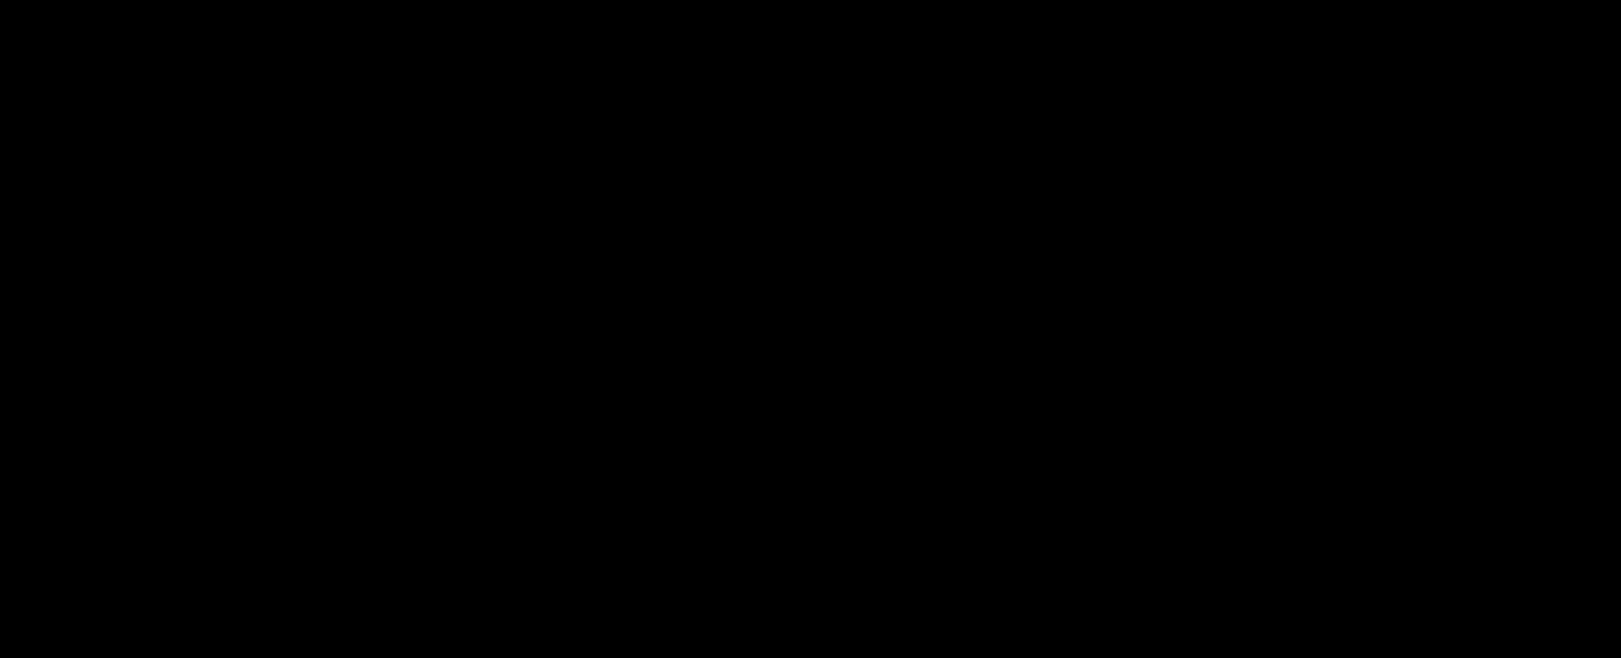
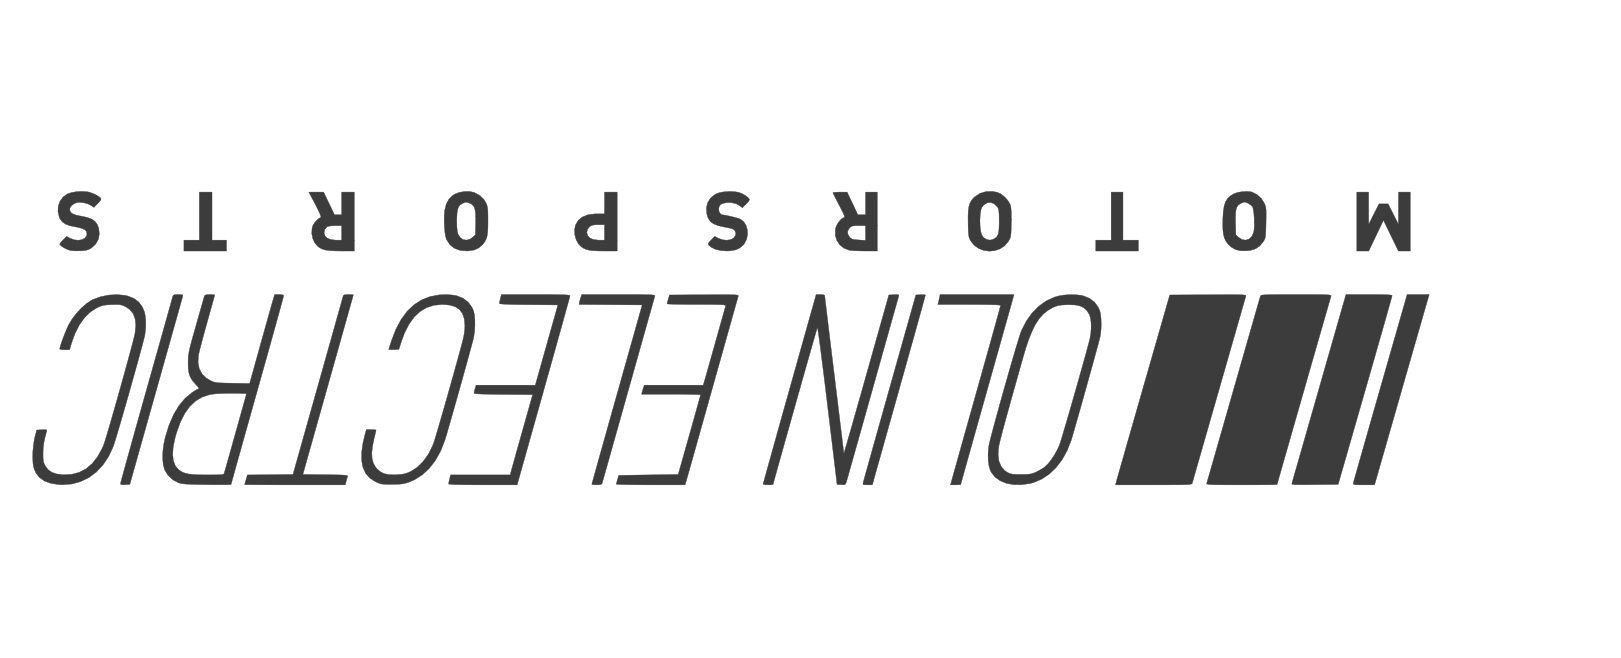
drawing: none -> [32, 191, 1430, 486]

